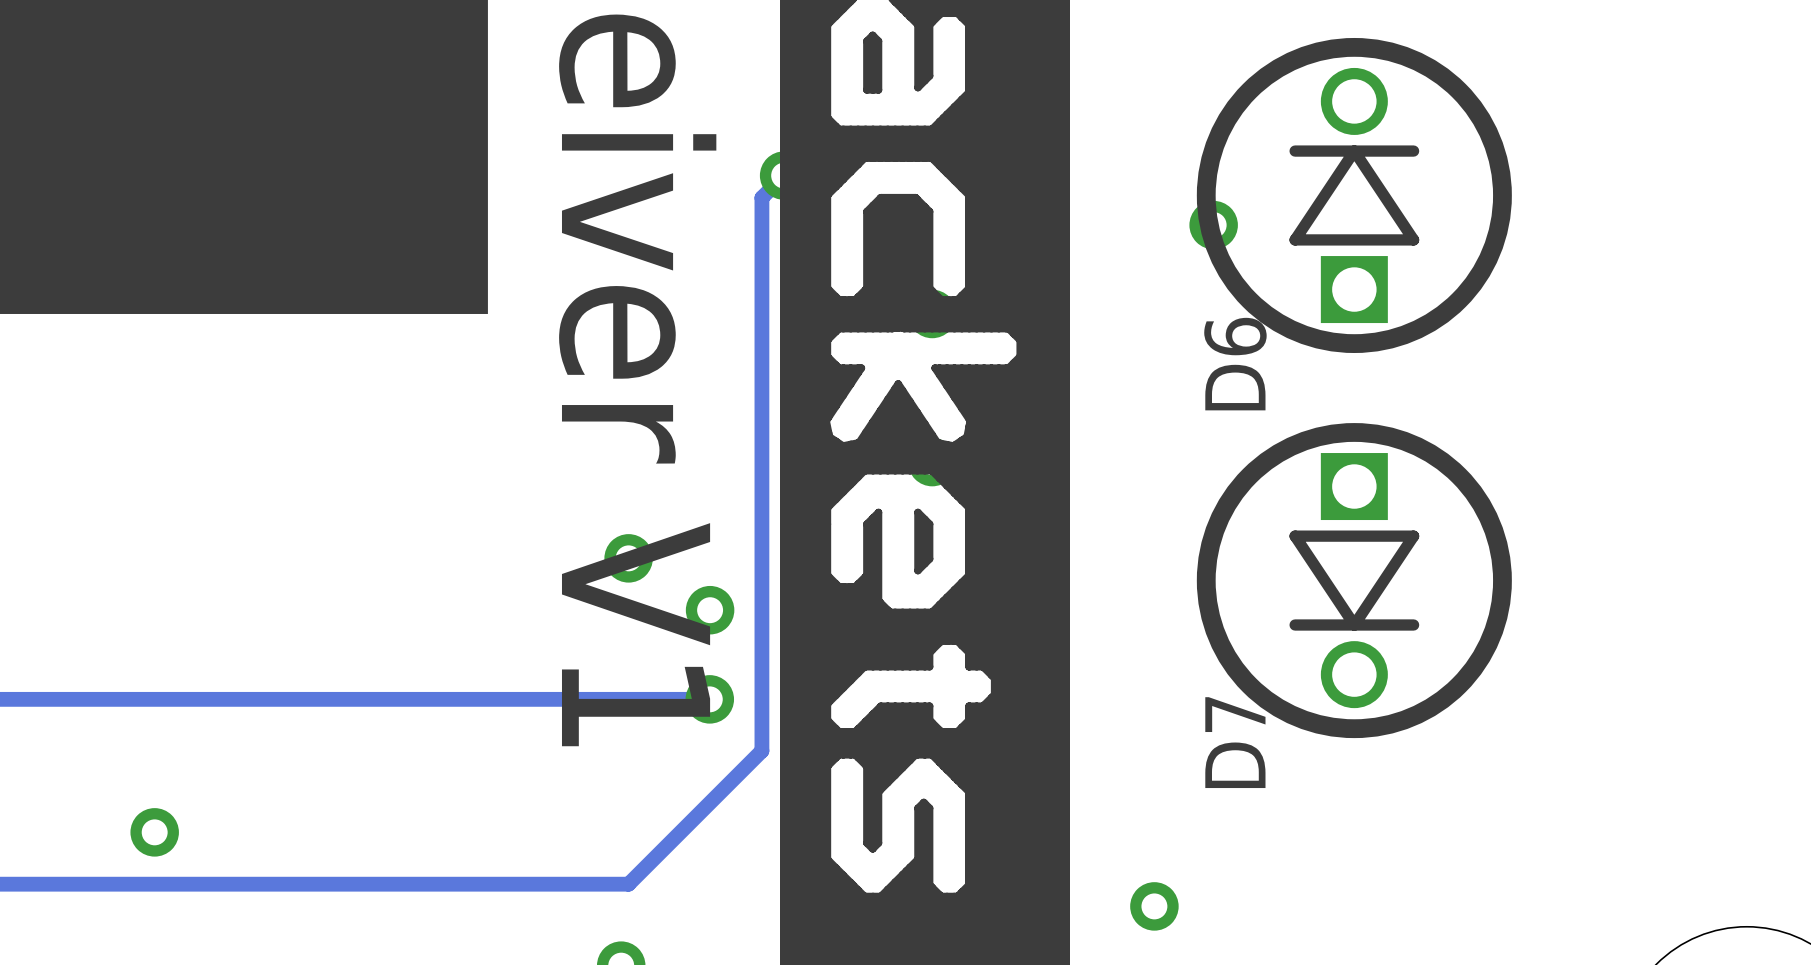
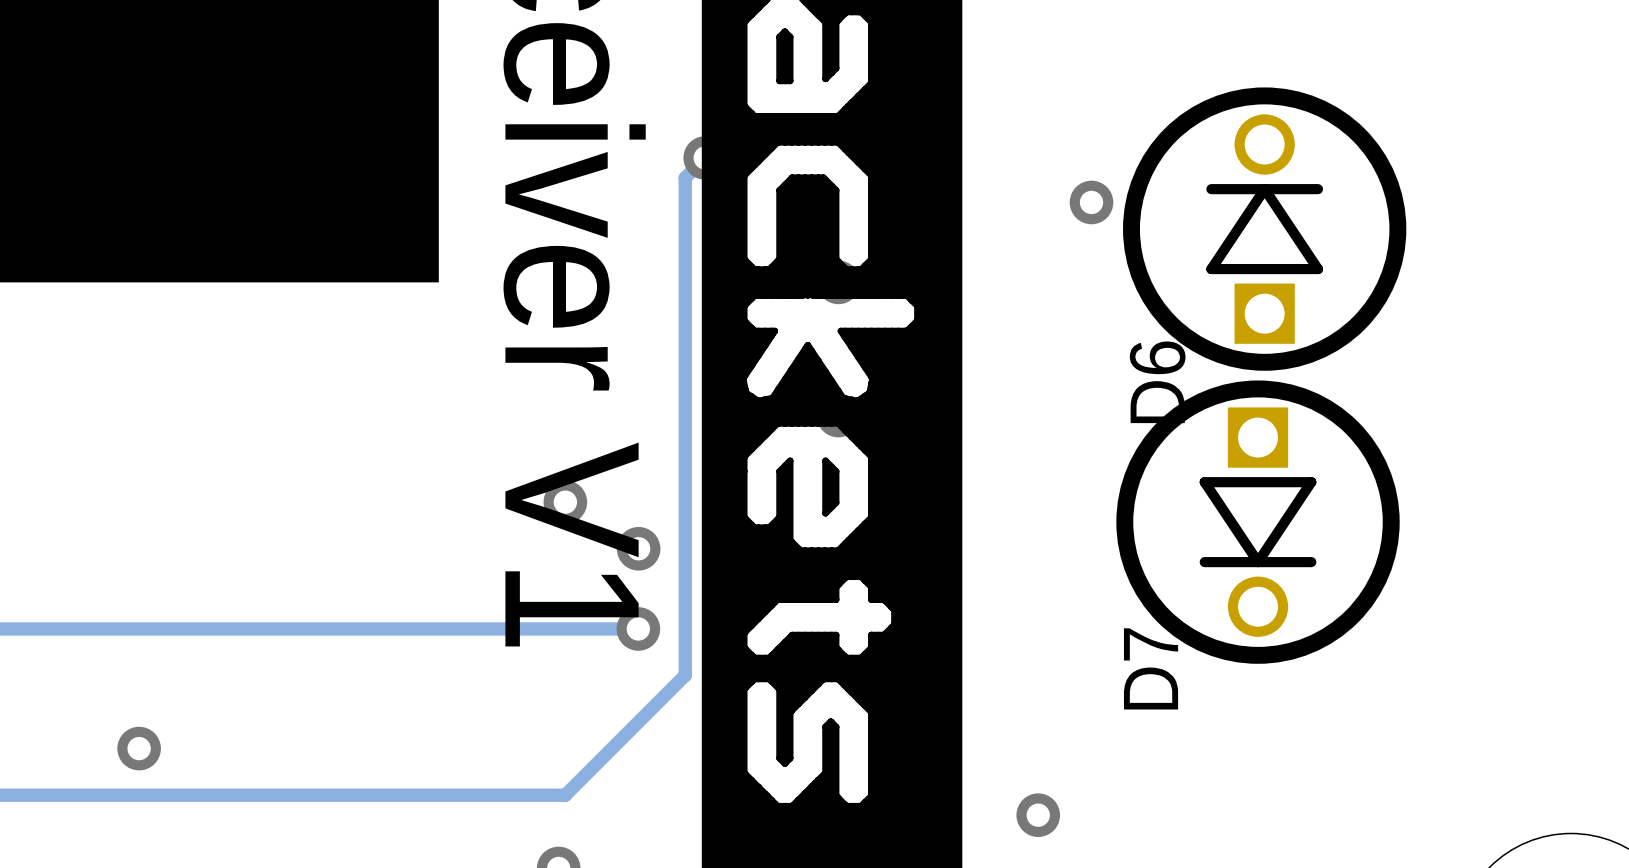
D6 position: (1354, 195) -> (1264, 229)
D7 position: (1354, 580) -> (1258, 522)

